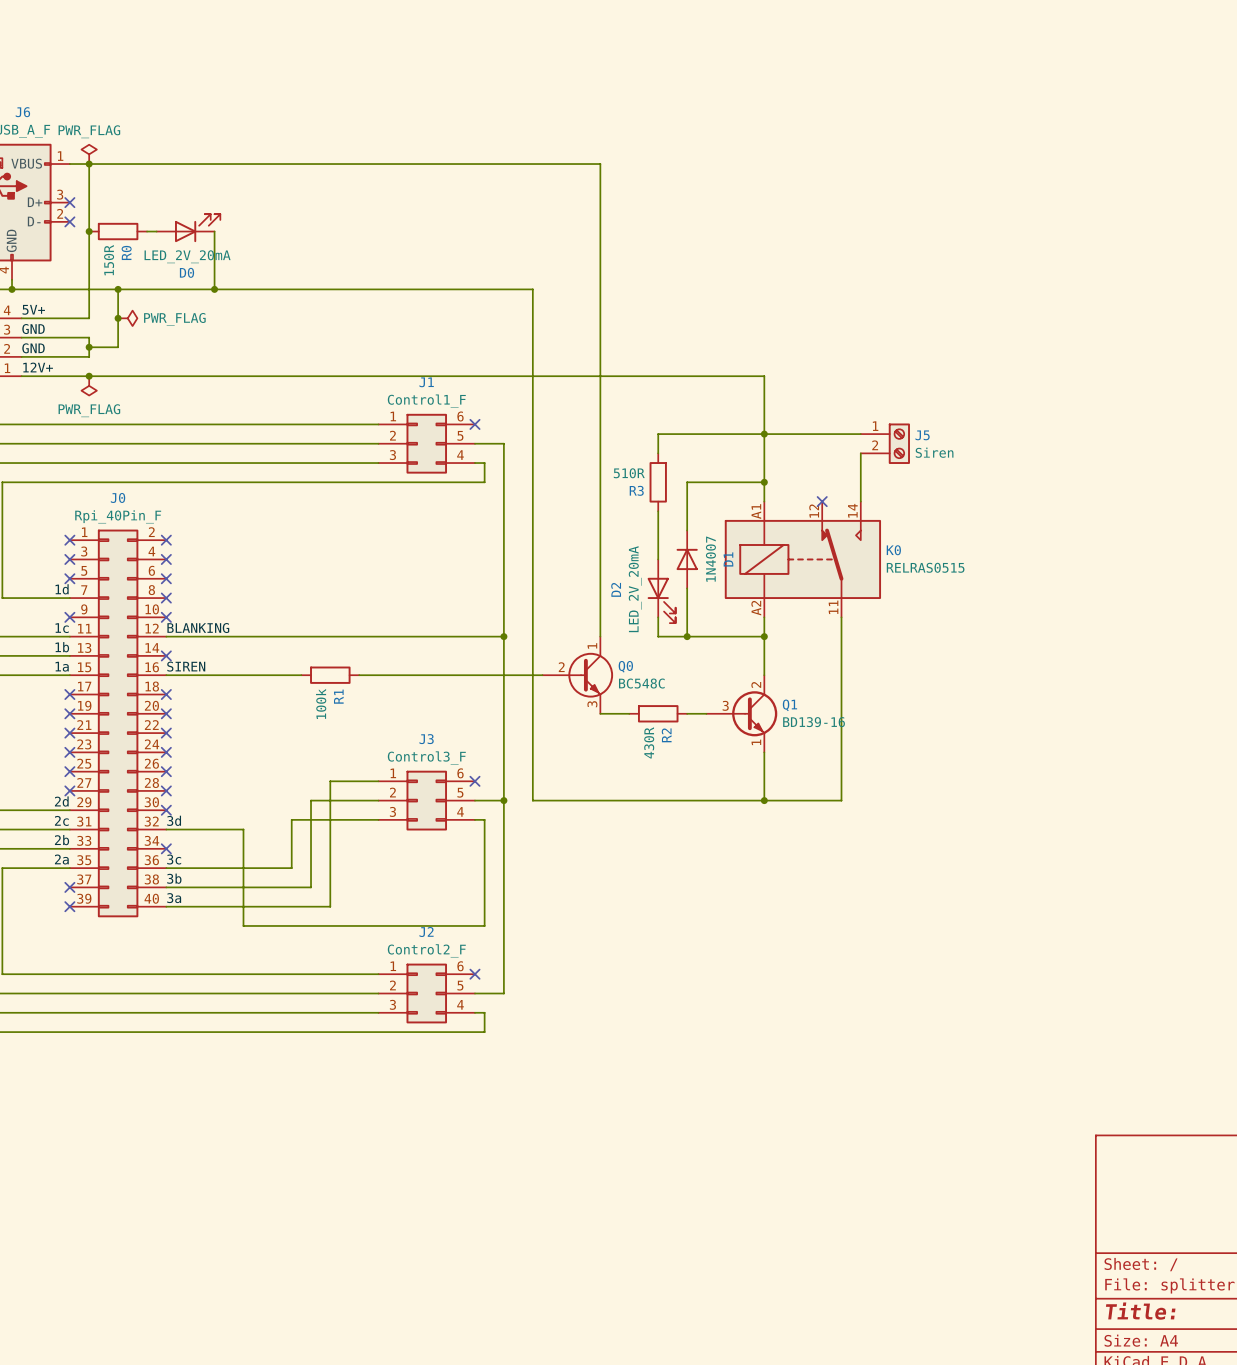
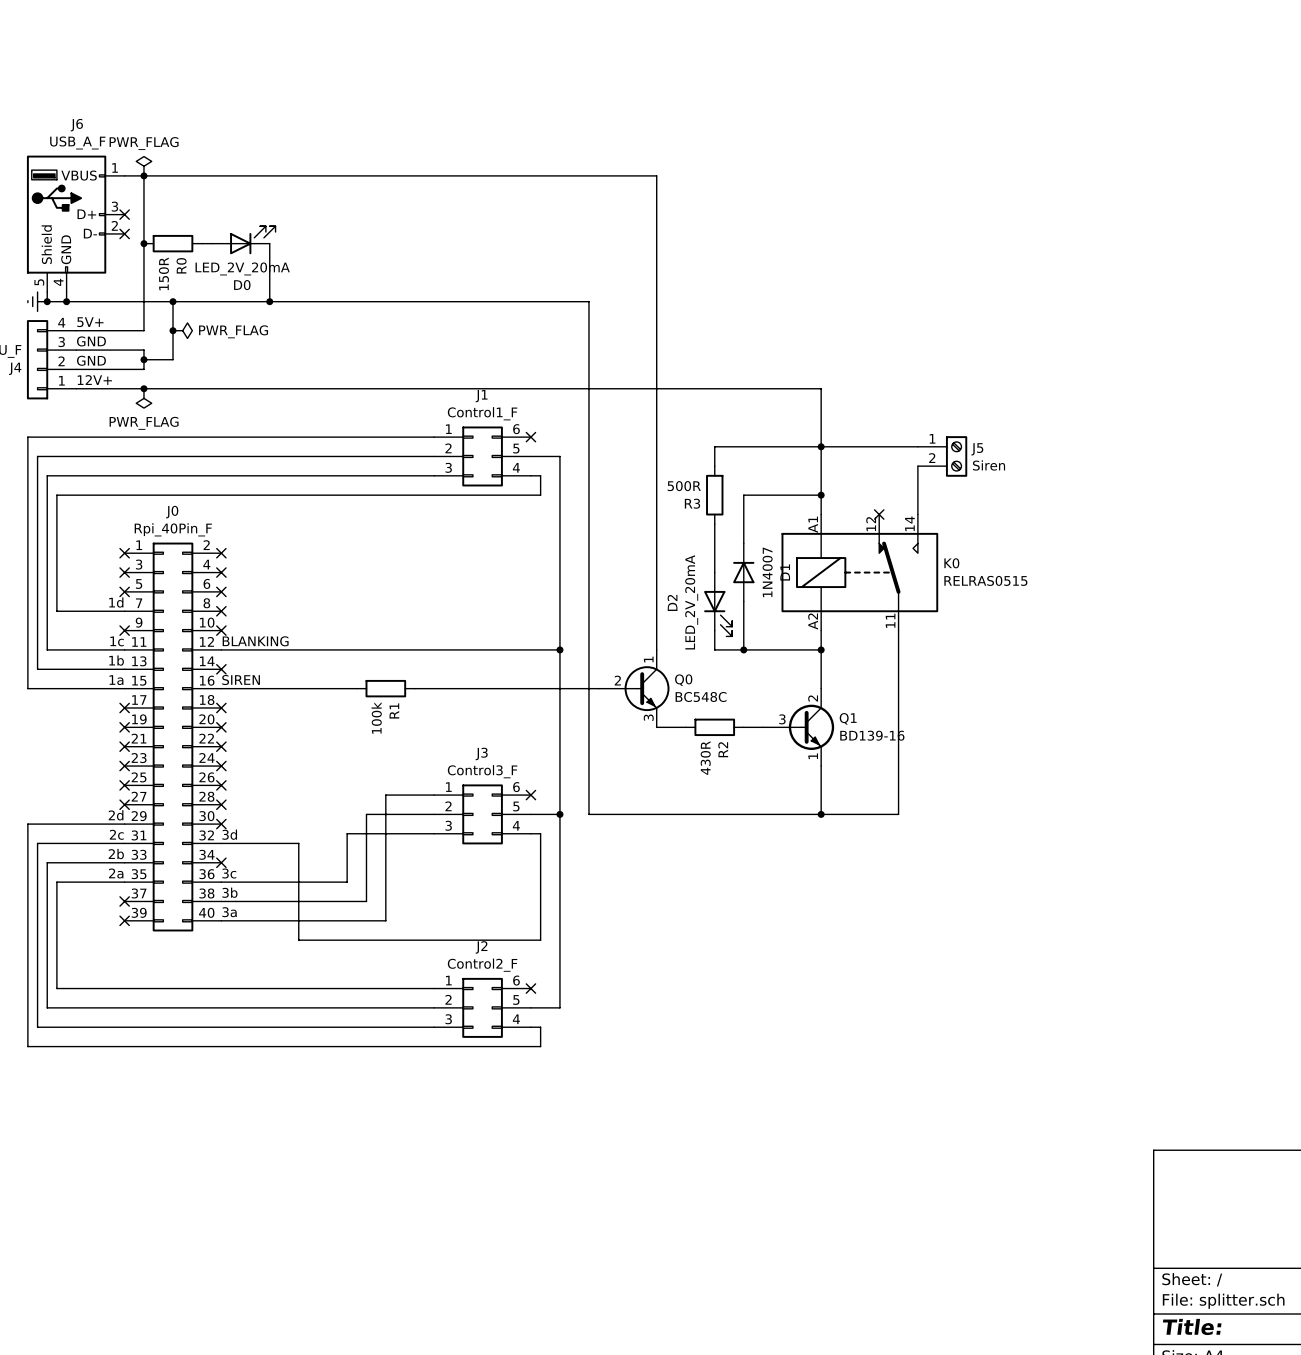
R3 value: 510R (629, 473) -> 500R (684, 486)

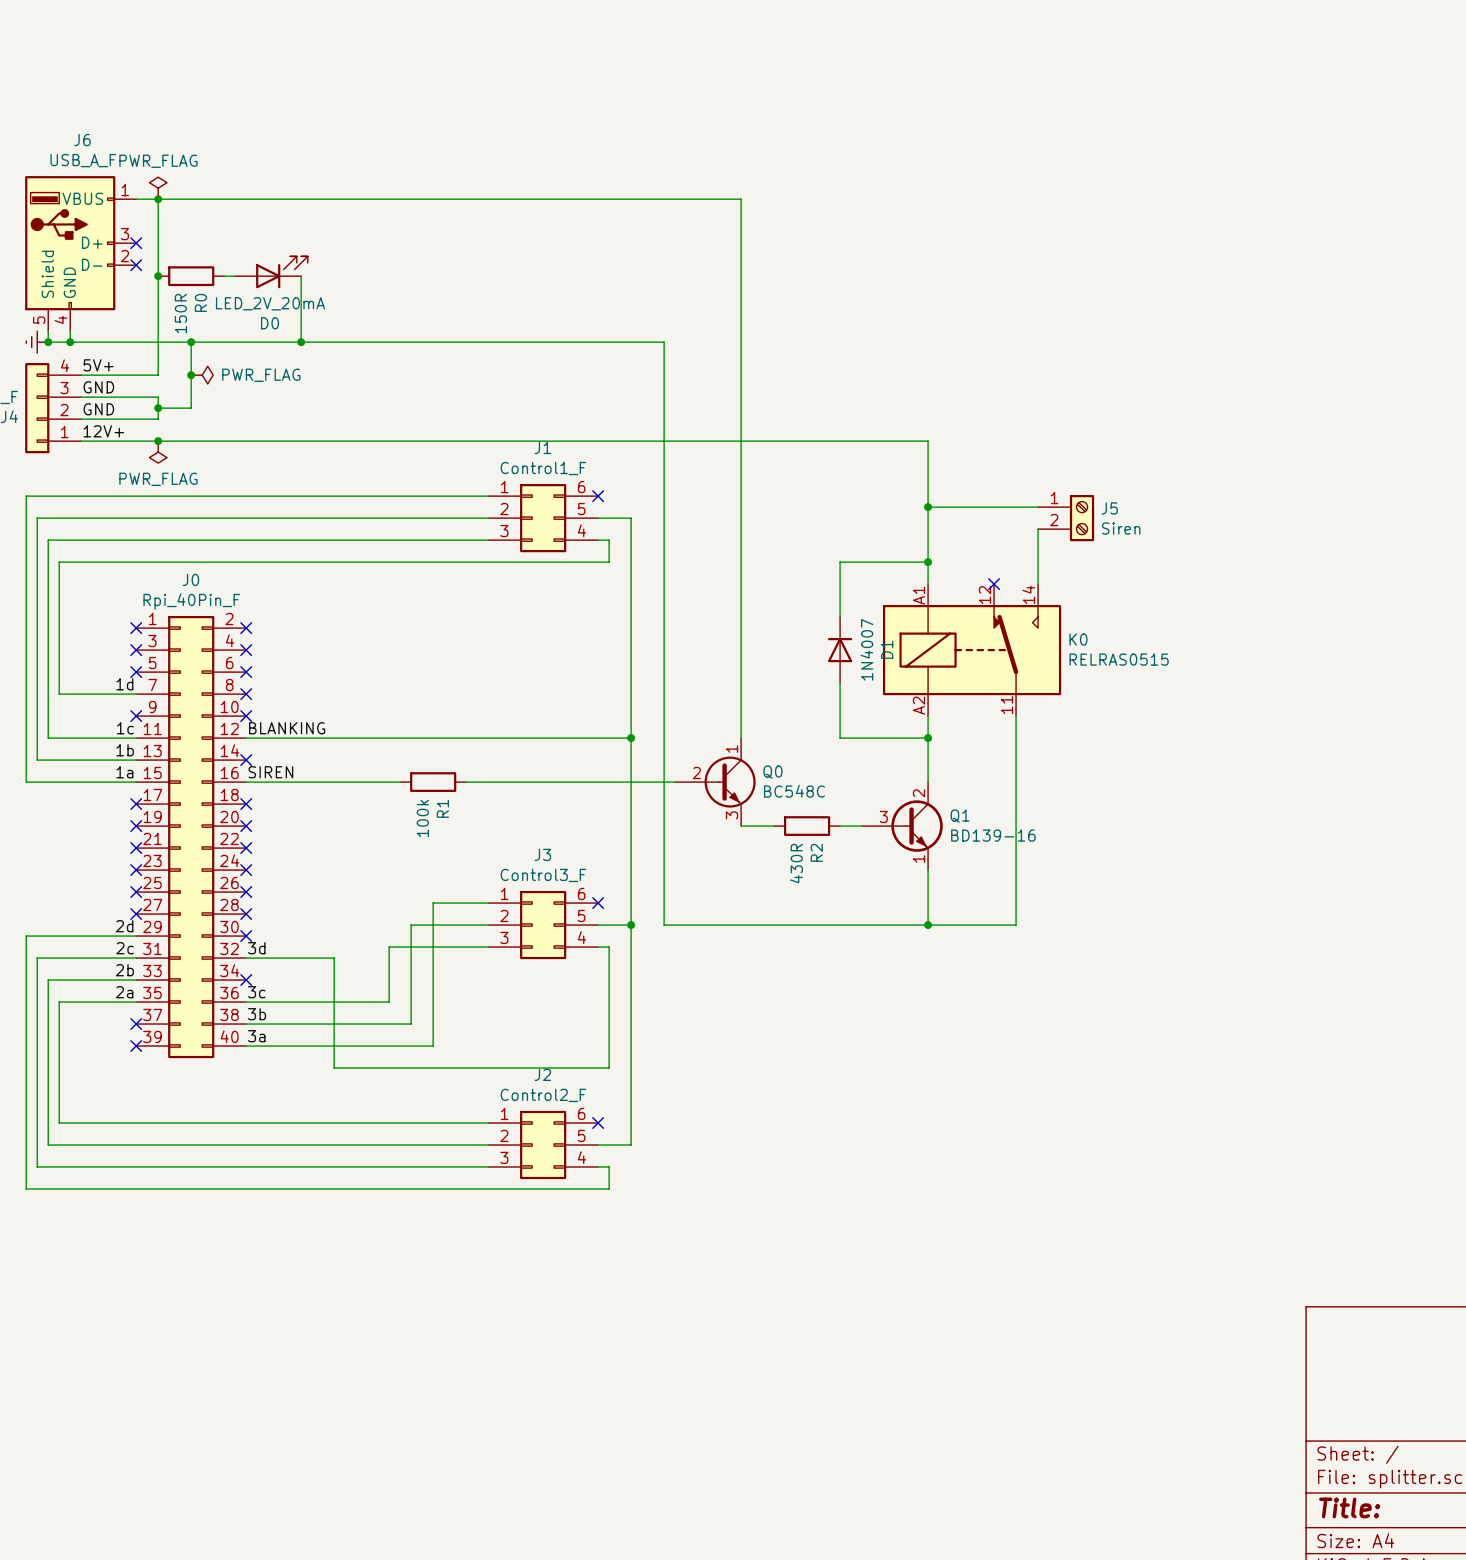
wire: (821, 446) (714, 446) (714, 466) -> none
R3: 500R (714, 495) -> none
wire: (714, 524) (714, 572) -> none
D2: LED_2V_20mA (718, 604) -> none
wire: (714, 630) (714, 649) (743, 649) -> none
junction: (743, 649) -> none

